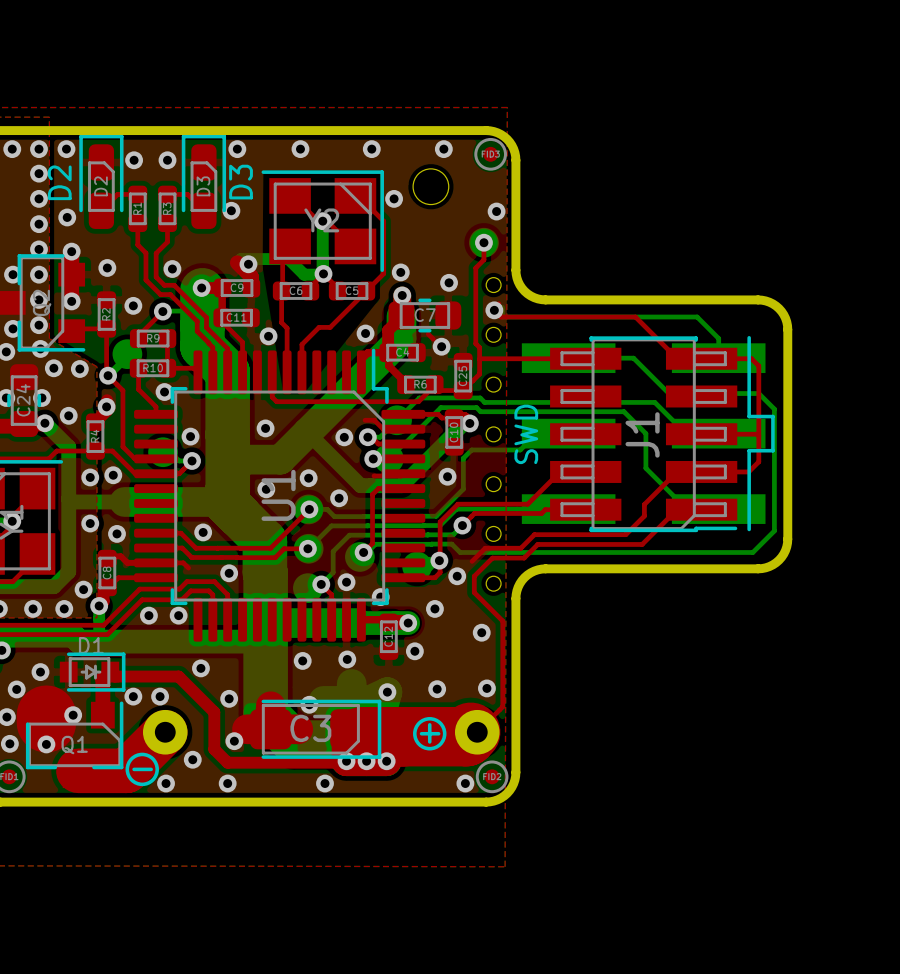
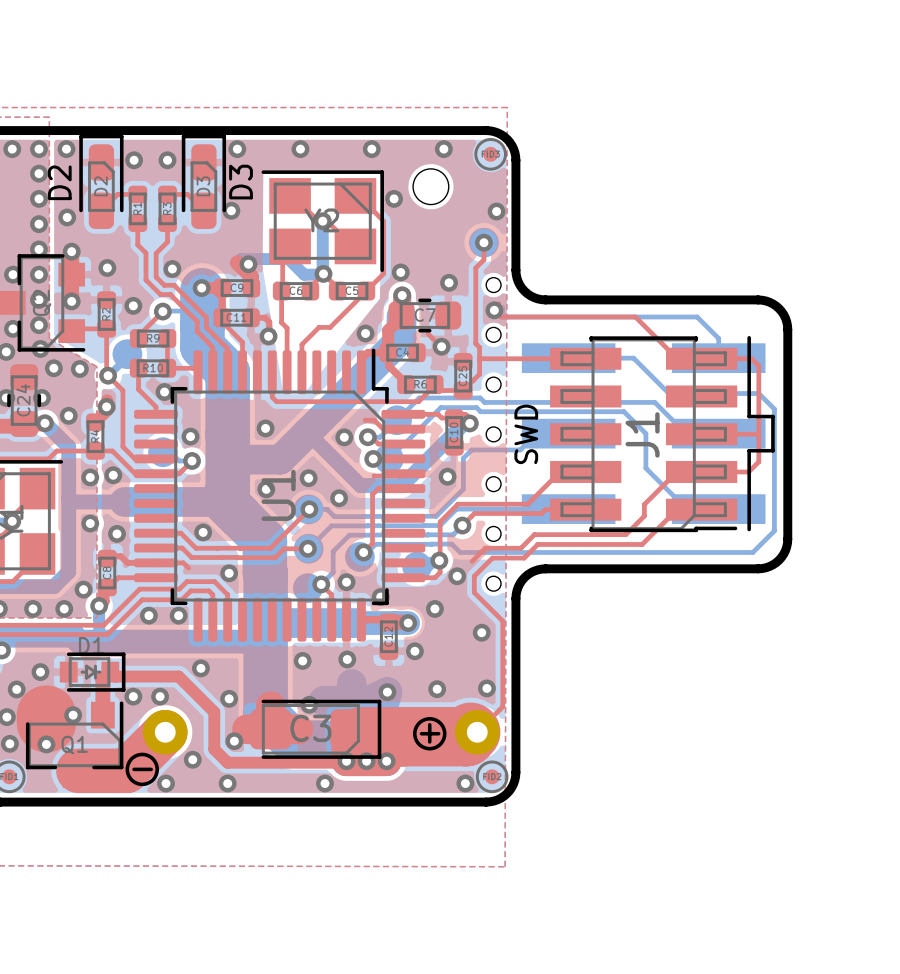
top track: none -> (251, 317) (264, 317) (269, 322) (269, 326)

